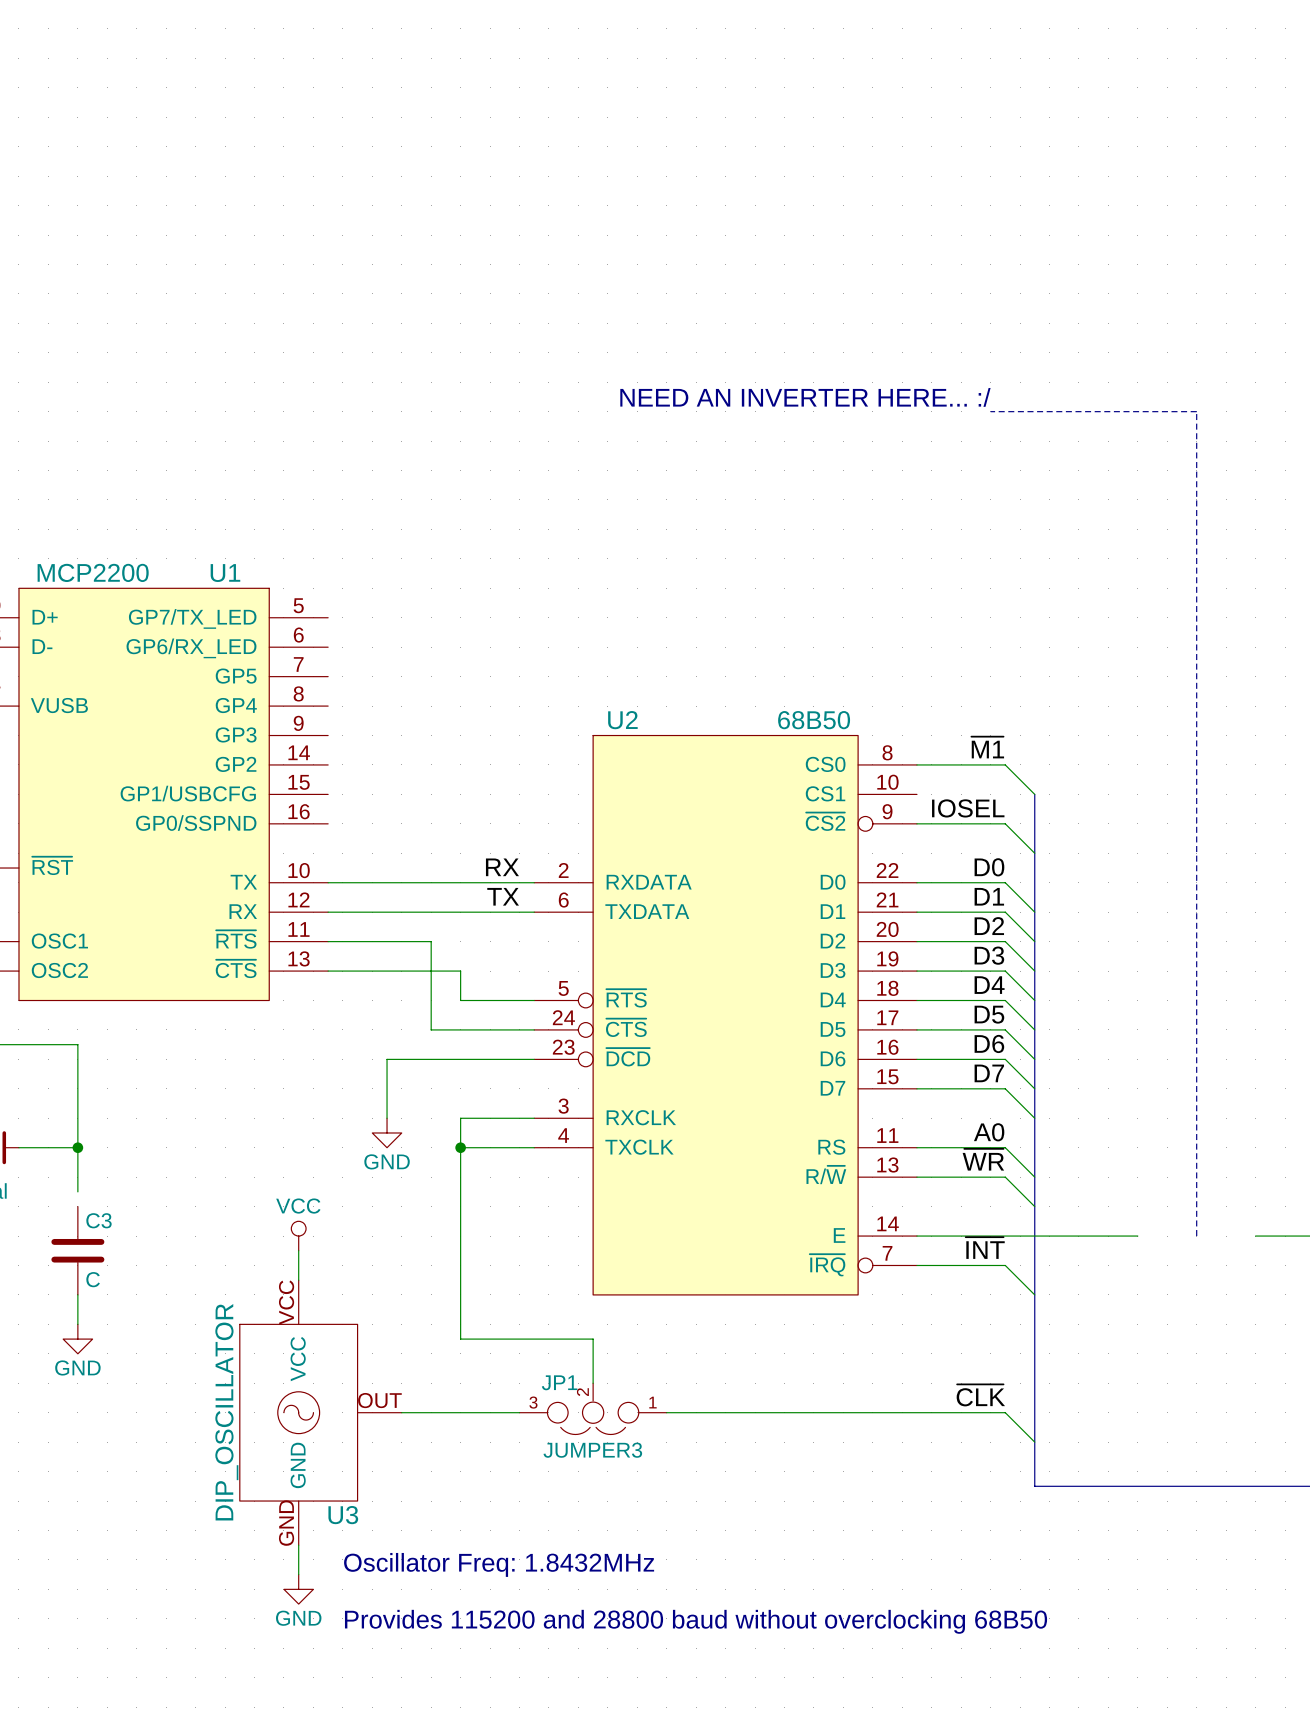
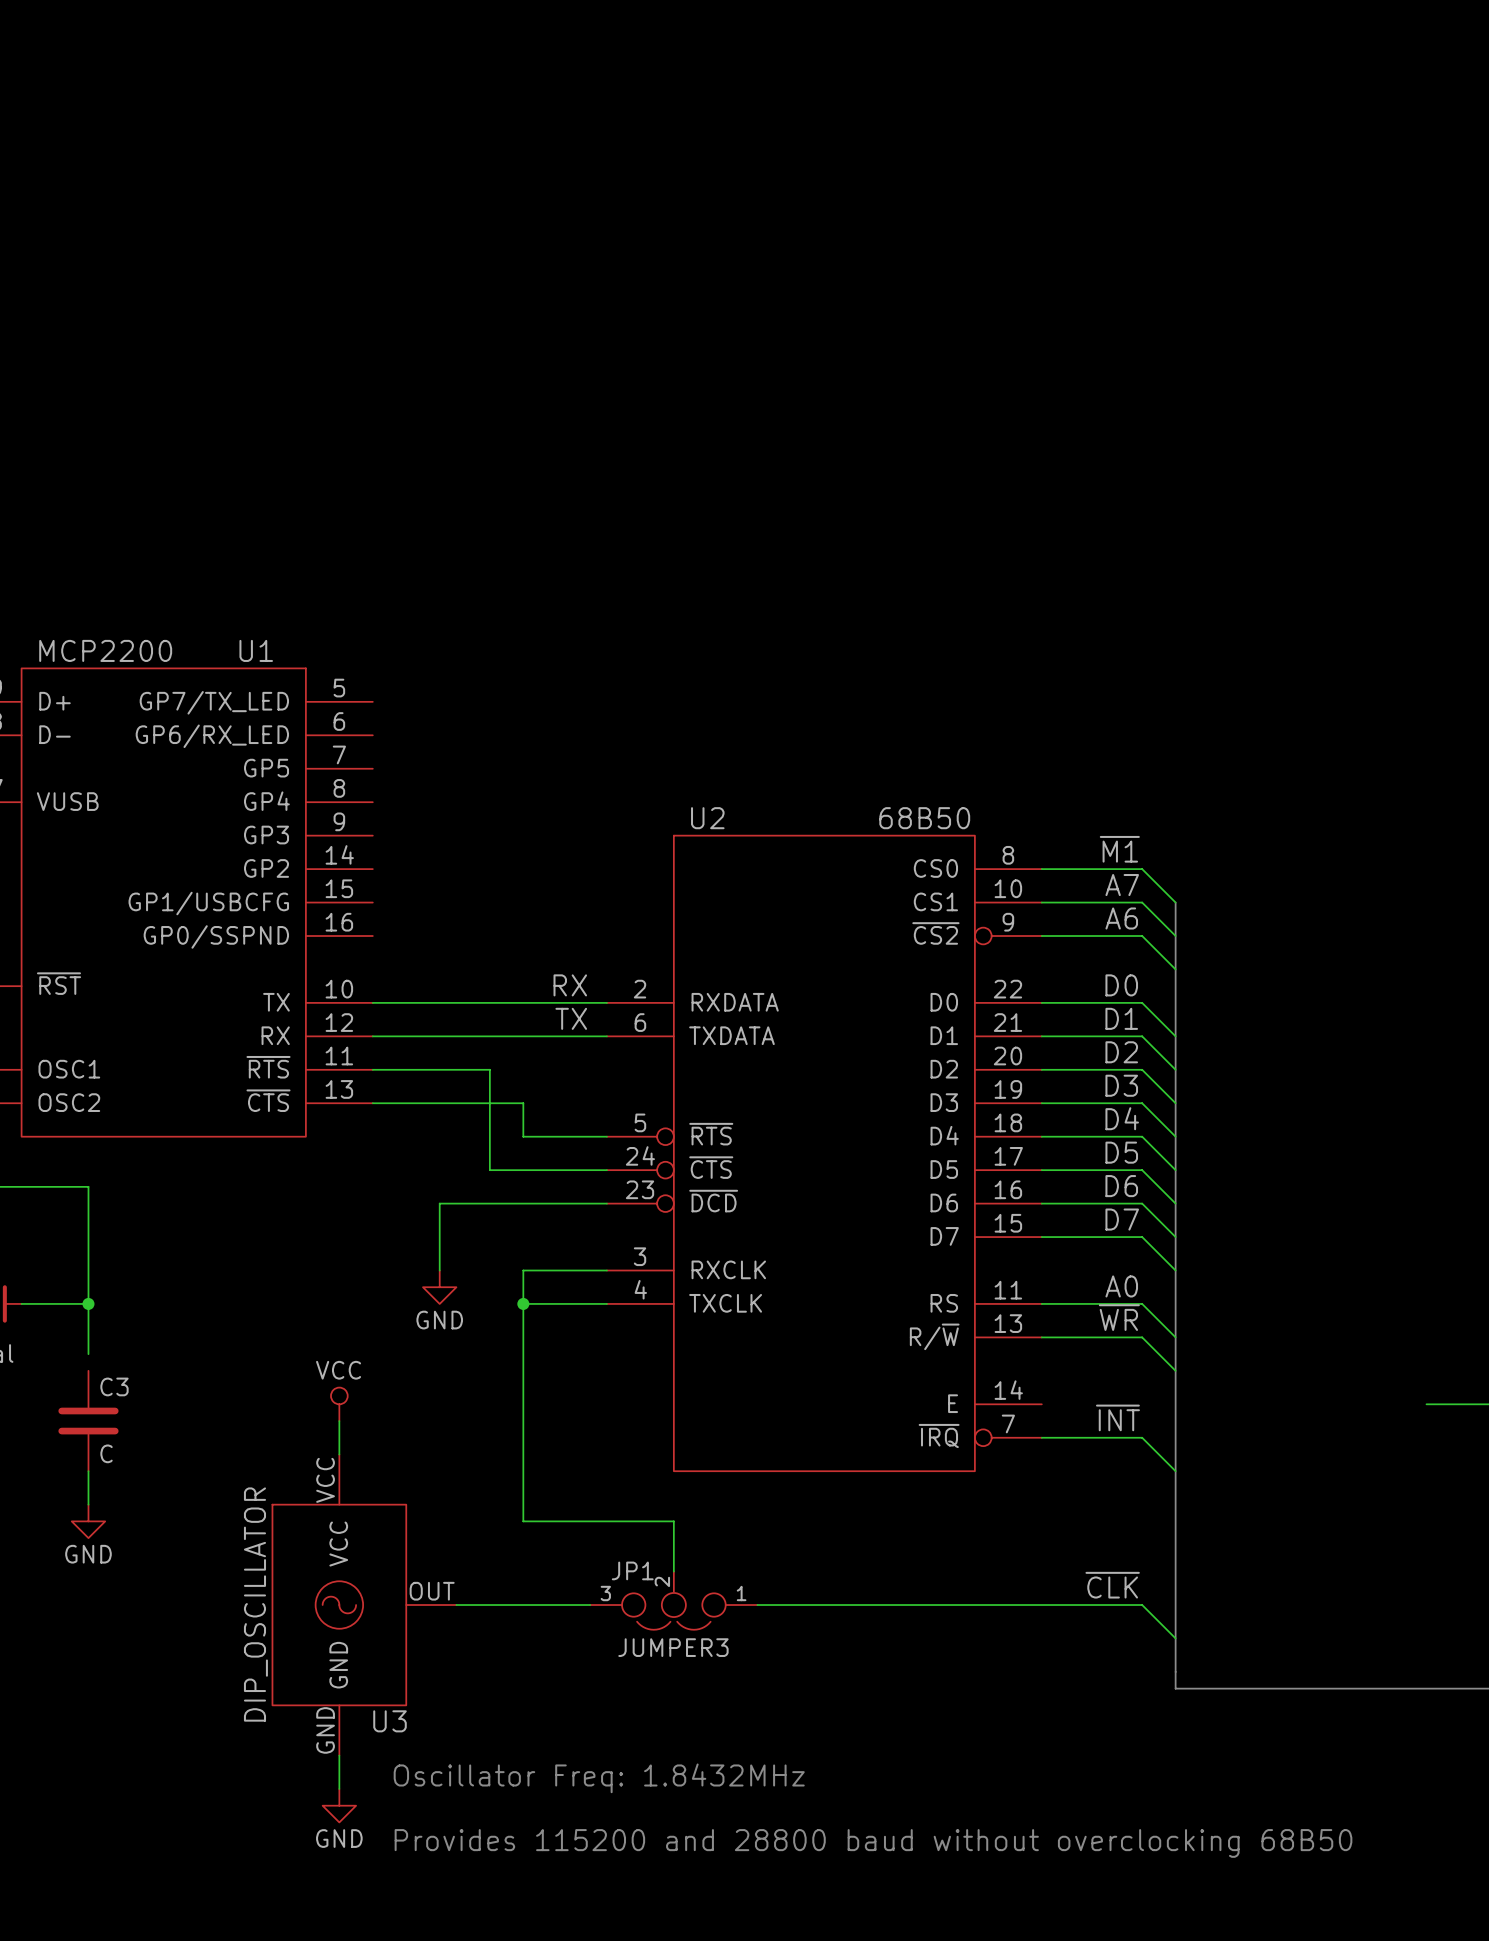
text: NEED AN INVERTER HERE... :/ (805, 397) -> none
line: (990, 411) (1196, 411) (1196, 1236) -> none
label: none -> A7 (1122, 885)
wire: none -> (1041, 902) (1142, 902) (1175, 936)
label: IOSEL (968, 808) -> A6 (1121, 918)
wire: (916, 1236) (1137, 1236) -> none

